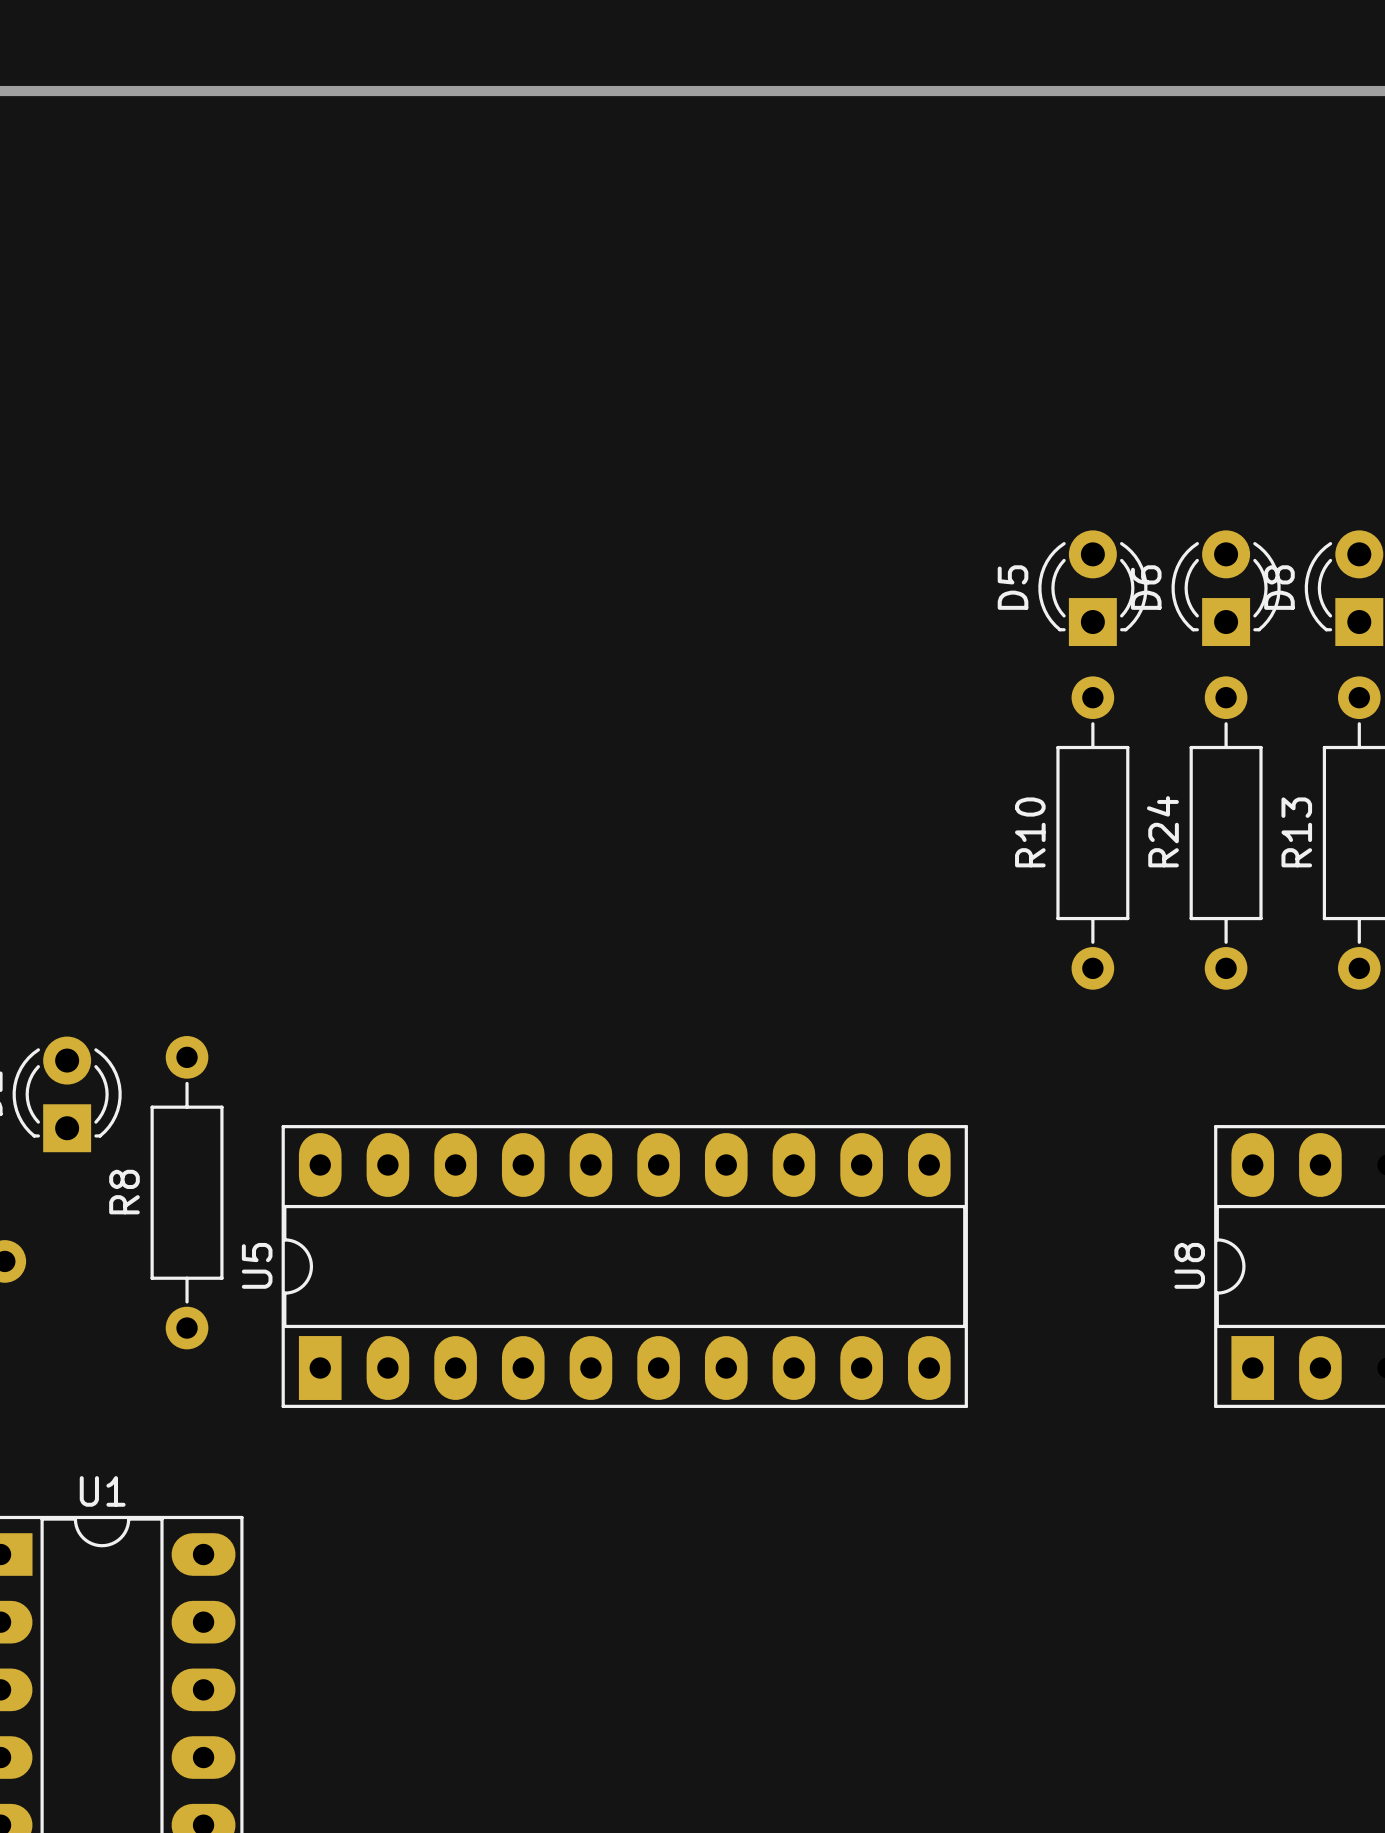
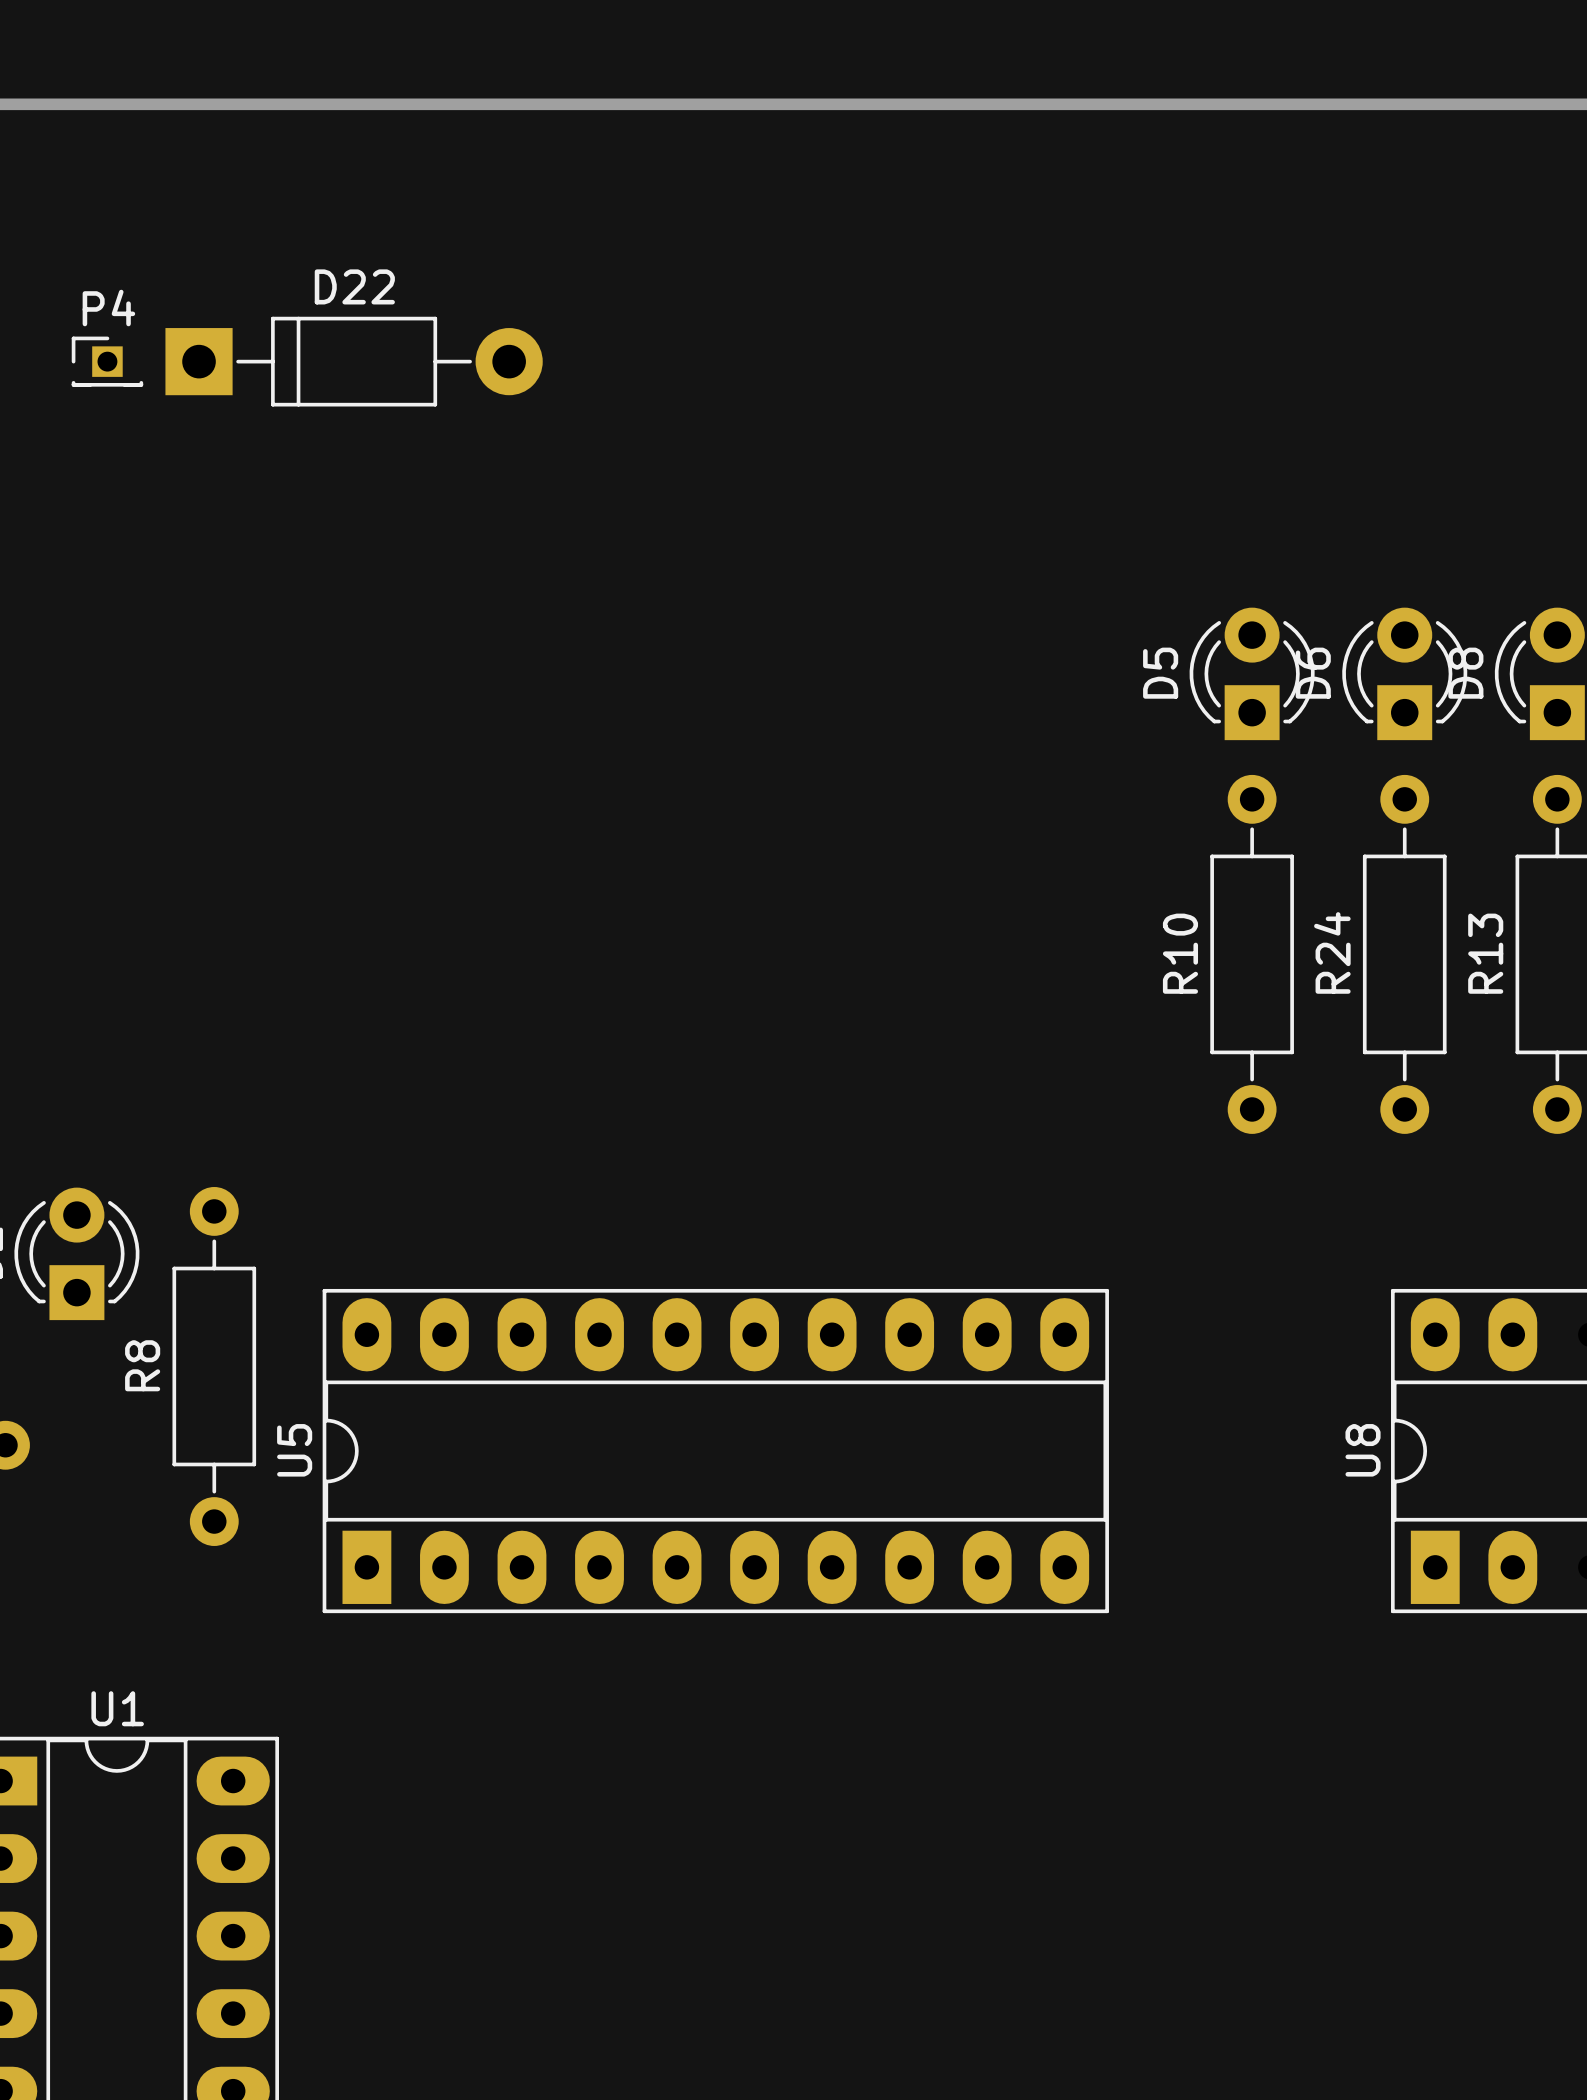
P4: none -> (107, 361)
D22: none -> (354, 361)

